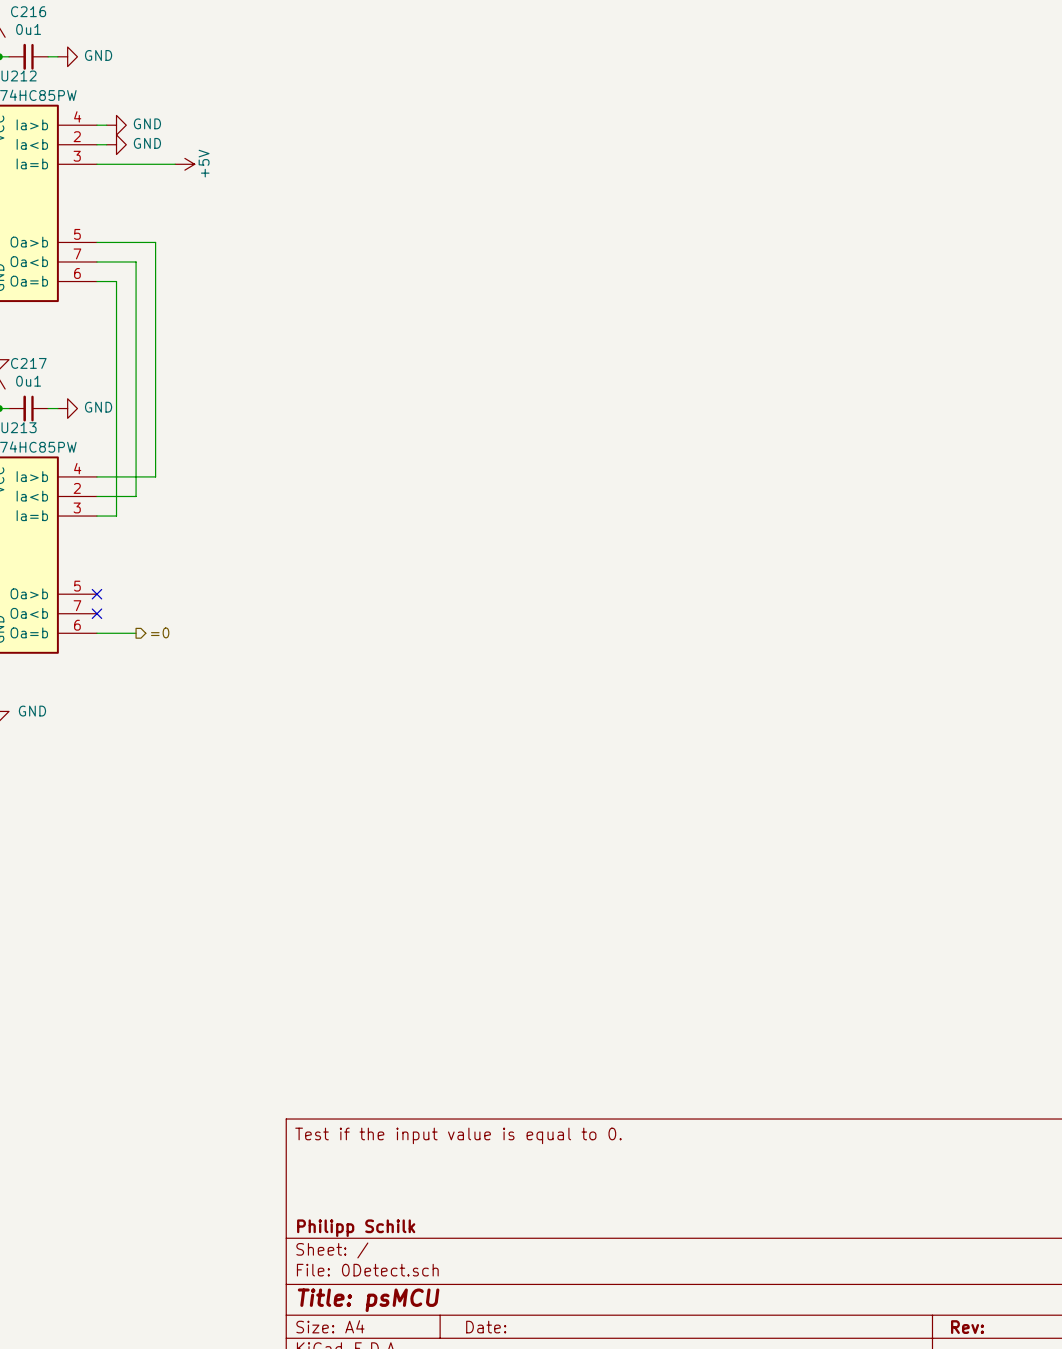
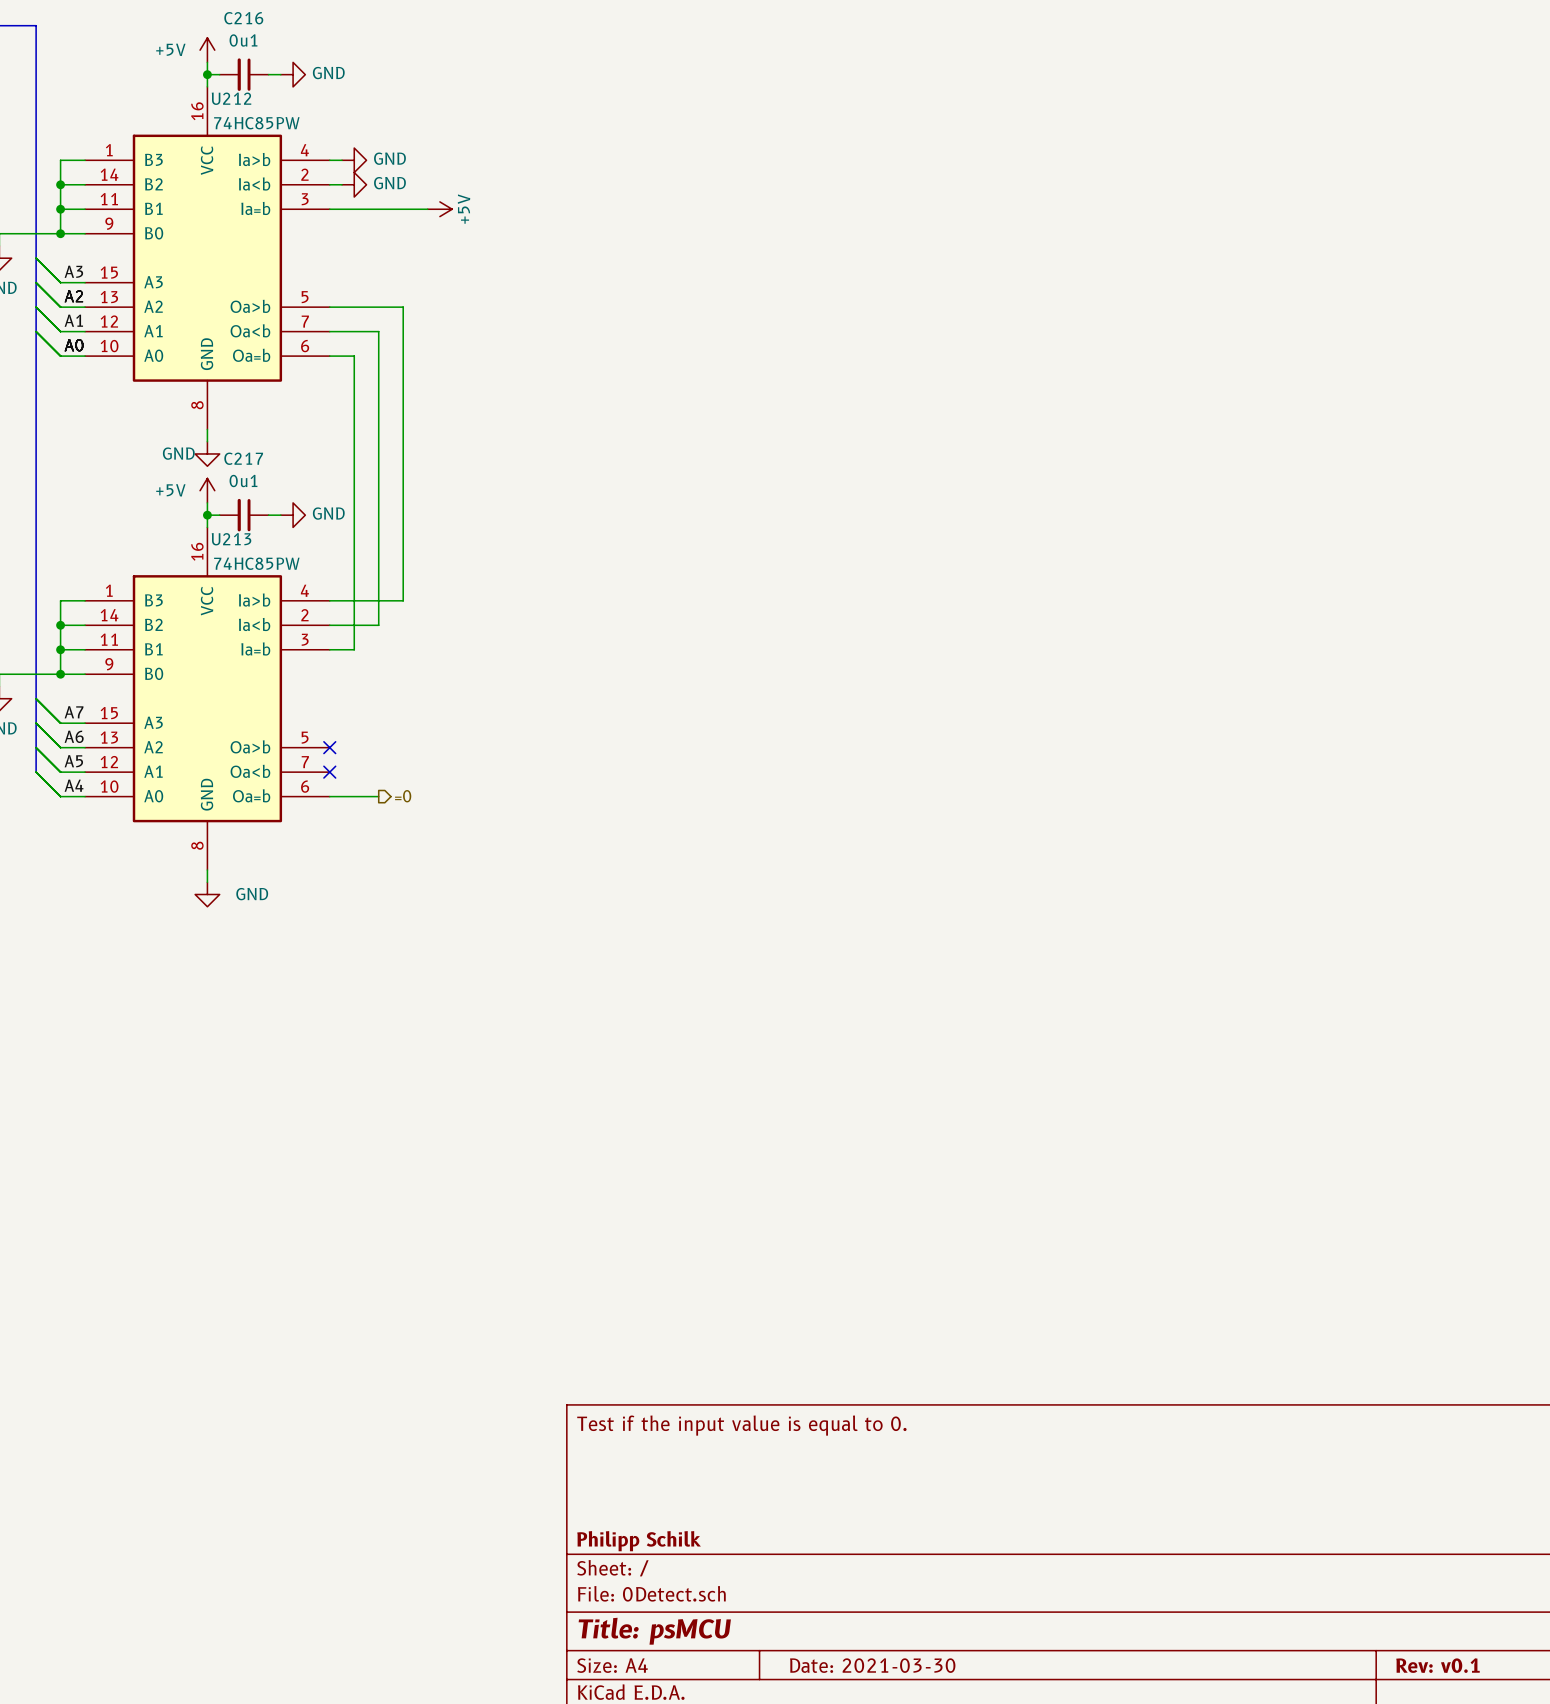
title block: Date: (486, 1327) -> Date: 2021-03-30 (872, 1665)
title block: Rev: (967, 1327) -> Rev: v0.1 (1437, 1665)

